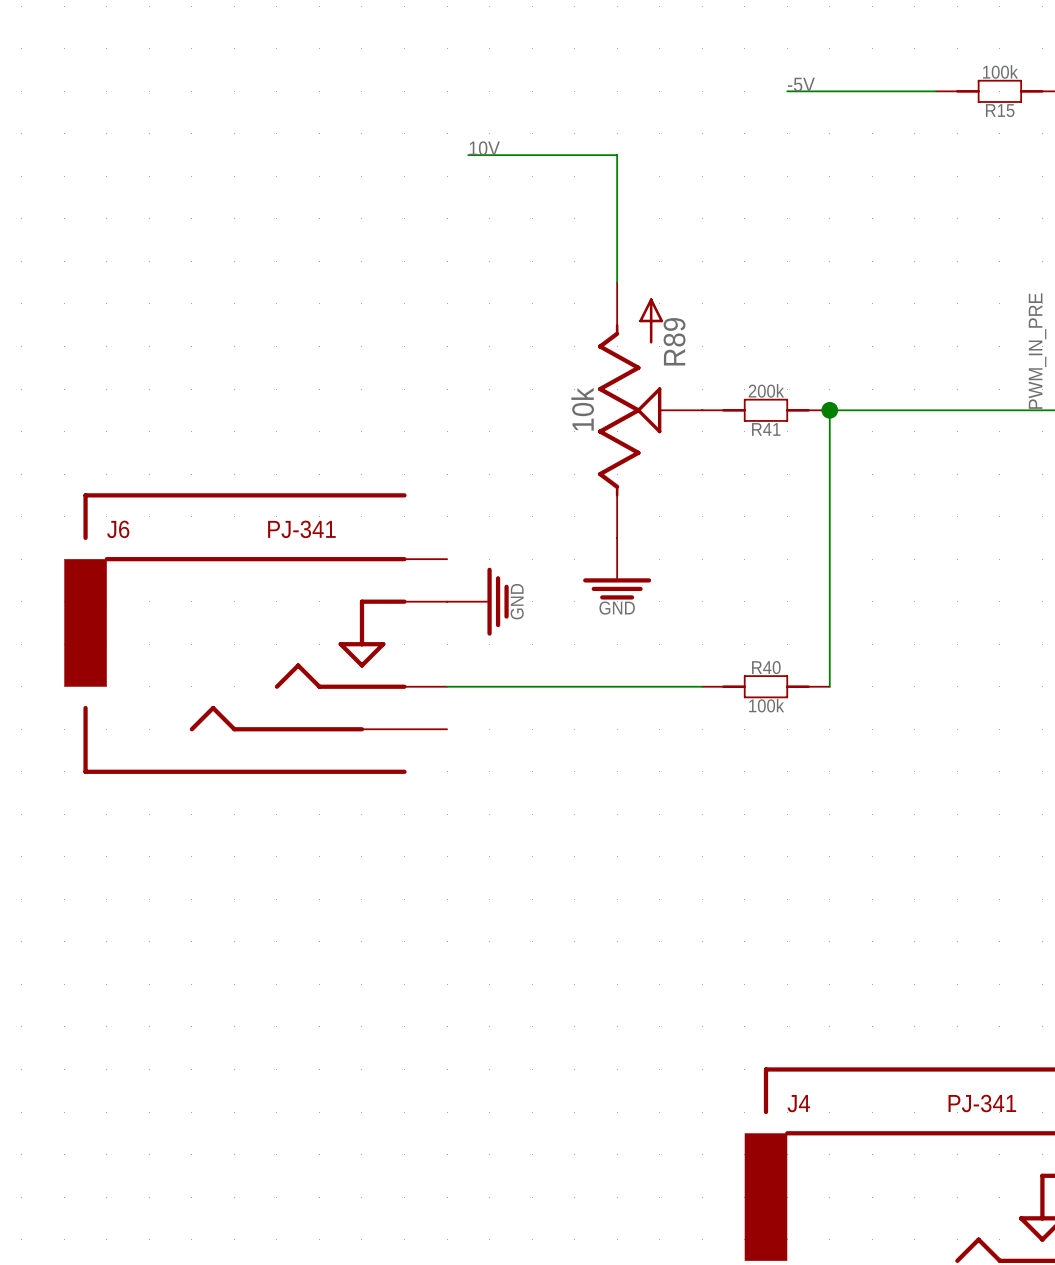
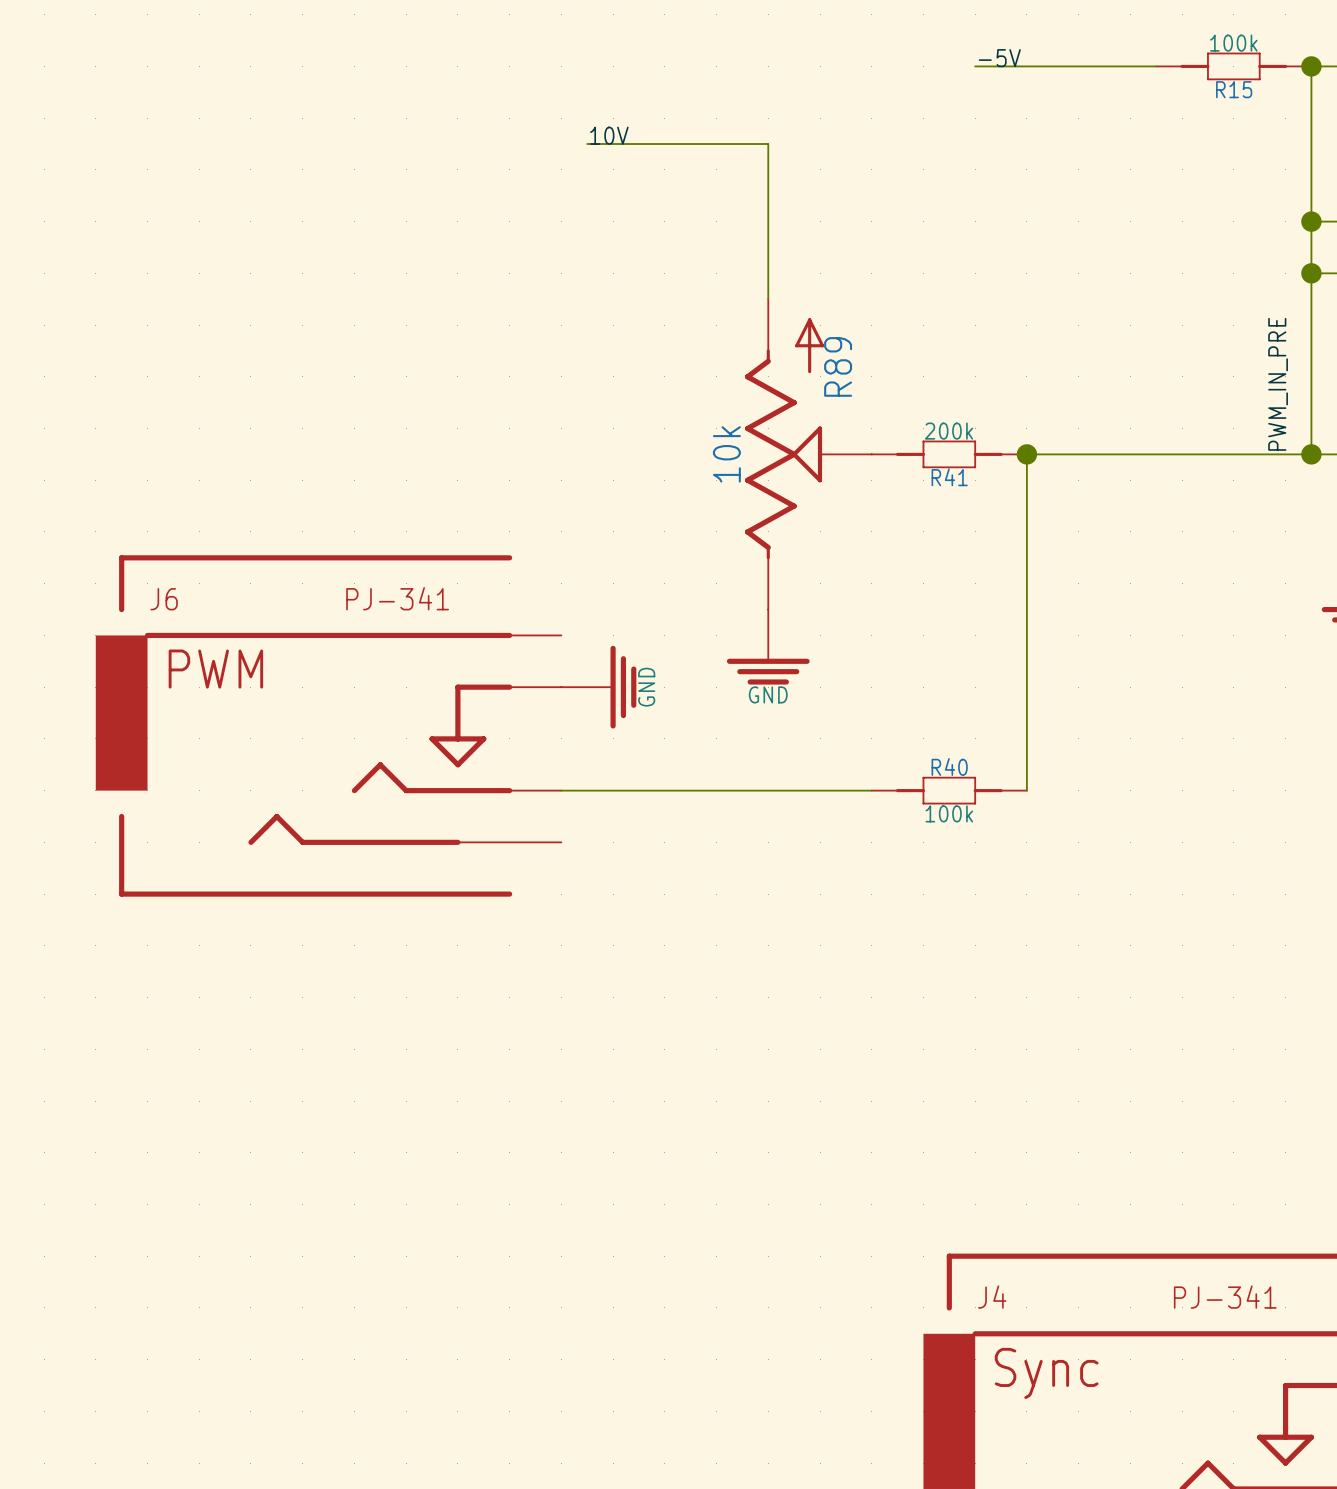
J6 text: none -> PWM (215, 669)
J4 text: none -> Sync (1046, 1373)

